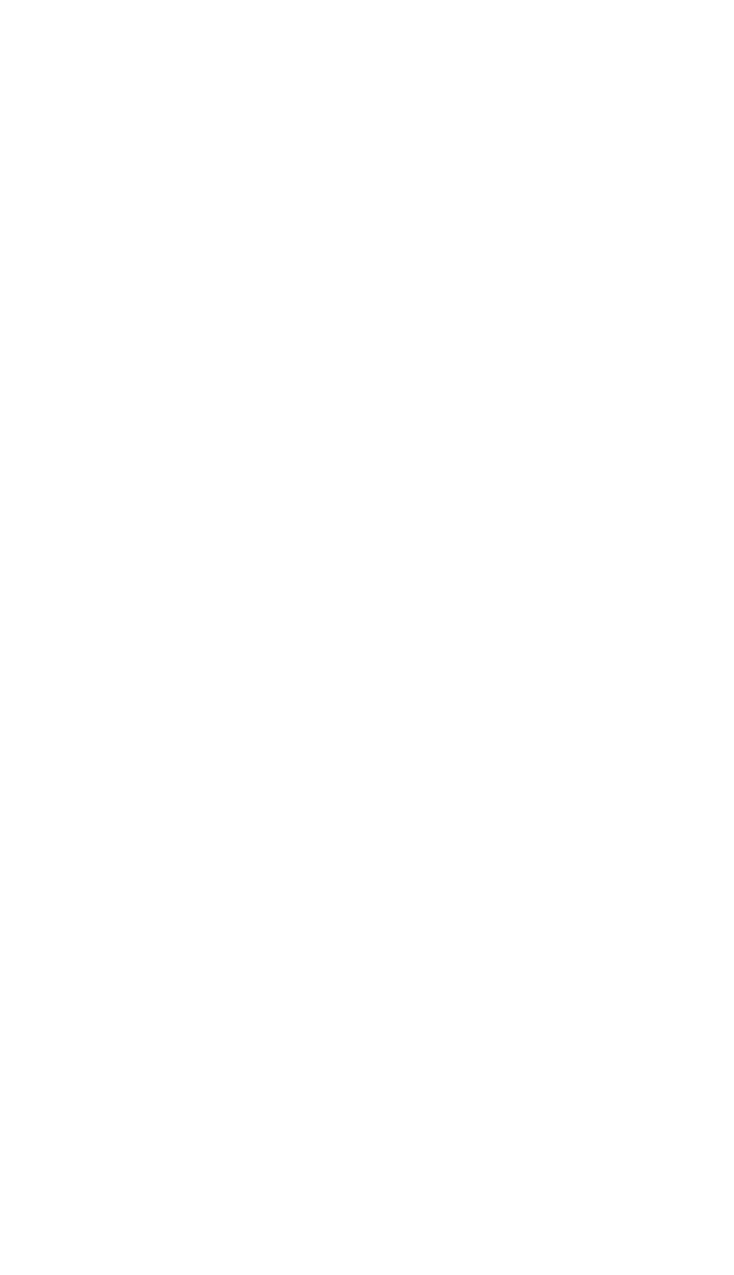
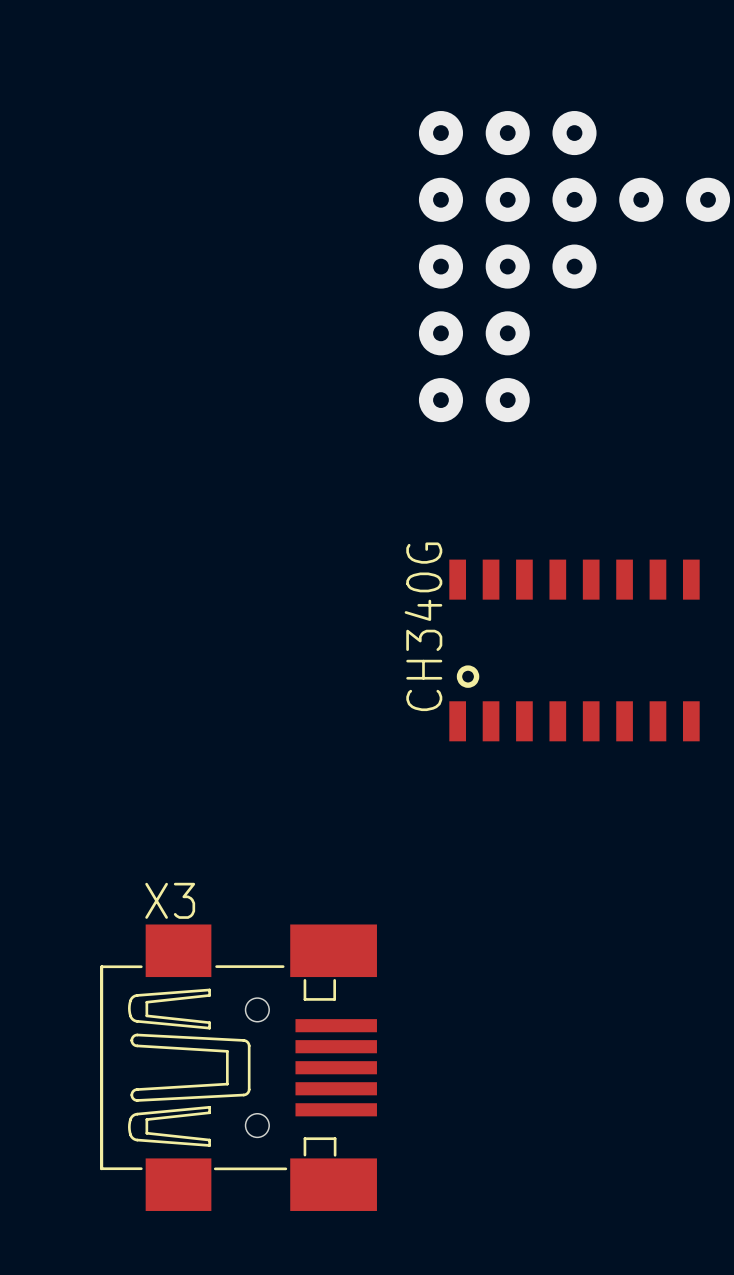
via: none -> (440, 133)
via: none -> (507, 133)
via: none -> (574, 133)
via: none -> (440, 199)
via: none -> (507, 199)
via: none -> (574, 199)
via: none -> (641, 199)
via: none -> (708, 199)
via: none -> (440, 266)
via: none -> (507, 266)
via: none -> (574, 266)
via: none -> (440, 333)
via: none -> (507, 333)
via: none -> (440, 400)
via: none -> (507, 400)
part: none -> (574, 650)
X3: none -> (238, 1067)

